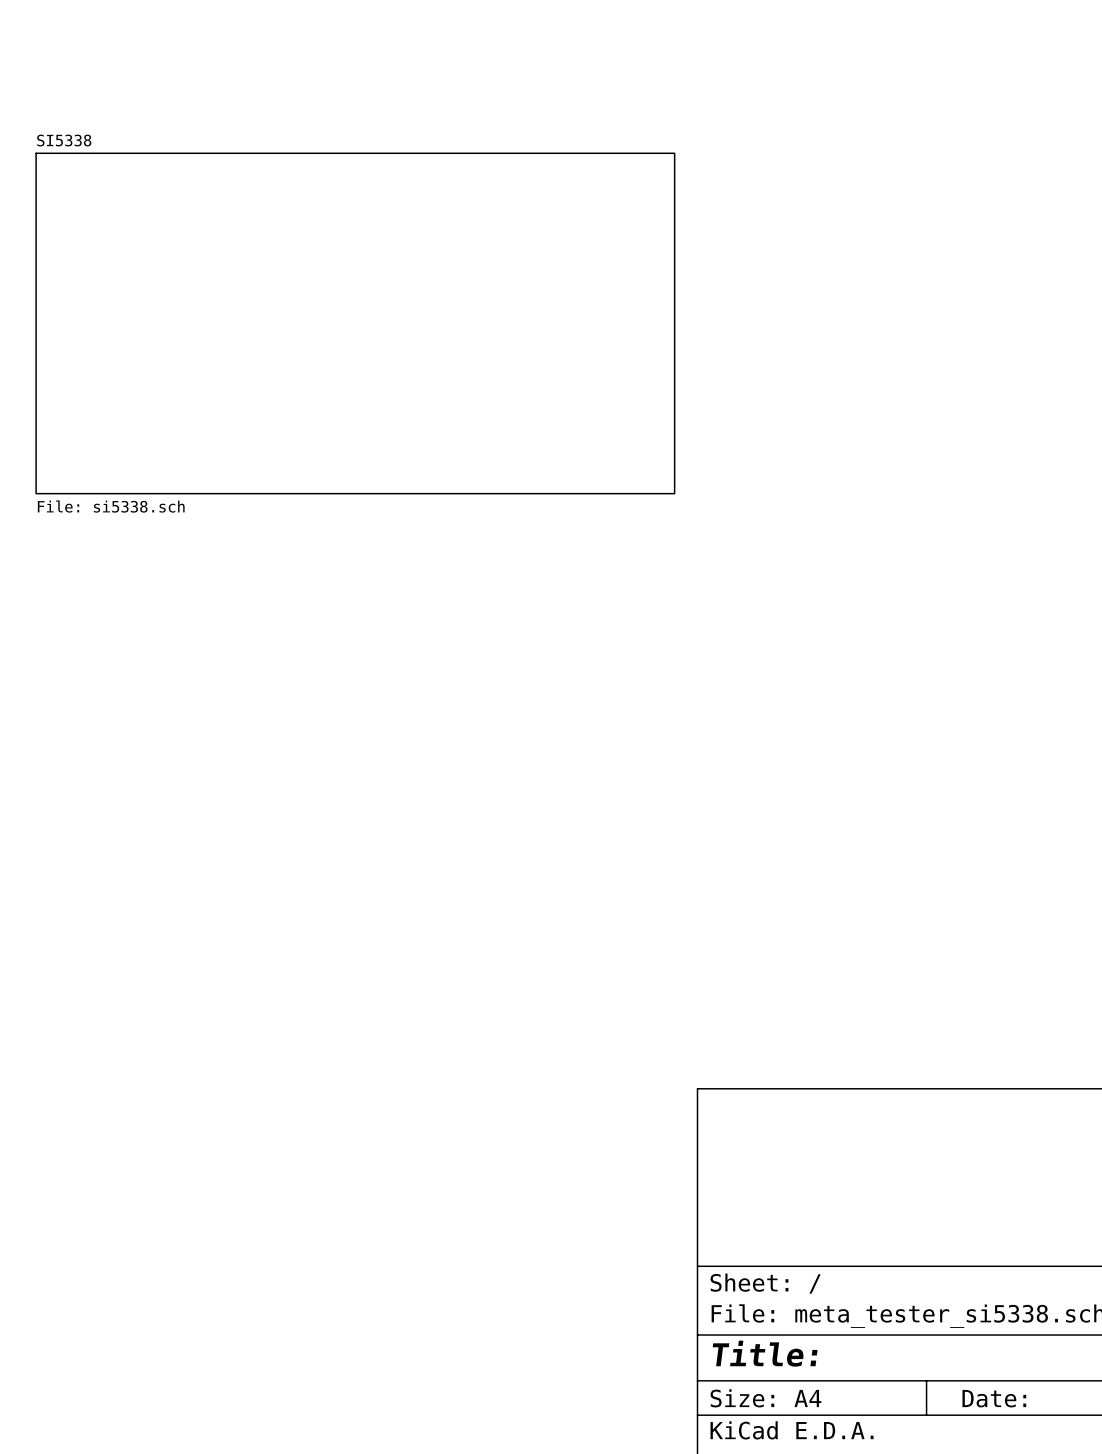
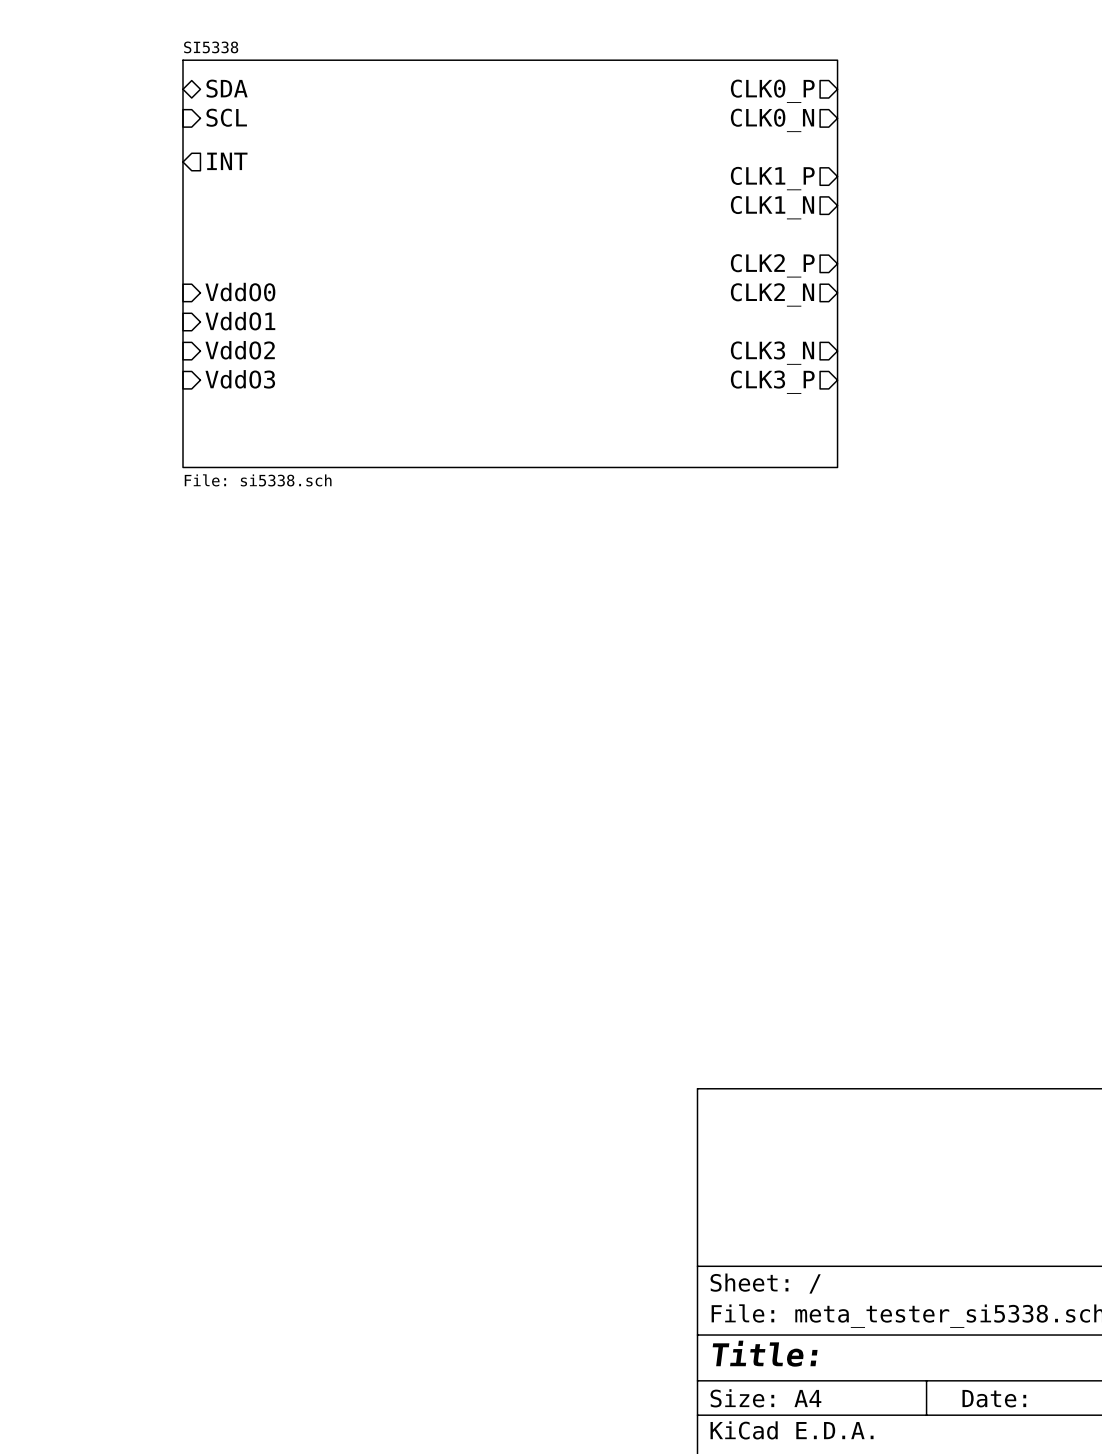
sheet pin: none -> SDA (227, 88)
sheet pin: none -> CLK0_P (772, 91)
sheet pin: none -> SCL (226, 117)
sheet pin: none -> CLK0_N (772, 120)
sheet SI5338 name position: SI5338 (64, 140) -> SI5338 (211, 47)
sheet SI5338 shape: [36, 153, 675, 494] -> [183, 60, 838, 468]
sheet pin: none -> INT (227, 161)
sheet pin: none -> CLK1_P (772, 178)
sheet pin: none -> CLK1_N (772, 207)
sheet pin: none -> CLK2_P (772, 265)
sheet pin: none -> VddO0 (240, 292)
sheet pin: none -> CLK2_N (772, 294)
sheet pin: none -> VddO1 (240, 321)
sheet pin: none -> VddO2 (240, 350)
sheet pin: none -> CLK3_N (772, 353)
sheet pin: none -> VddO3 (240, 379)
sheet pin: none -> CLK3_P (772, 382)
sheet SI5338 value position: File: si5338.sch (111, 506) -> File: si5338.sch (258, 480)

